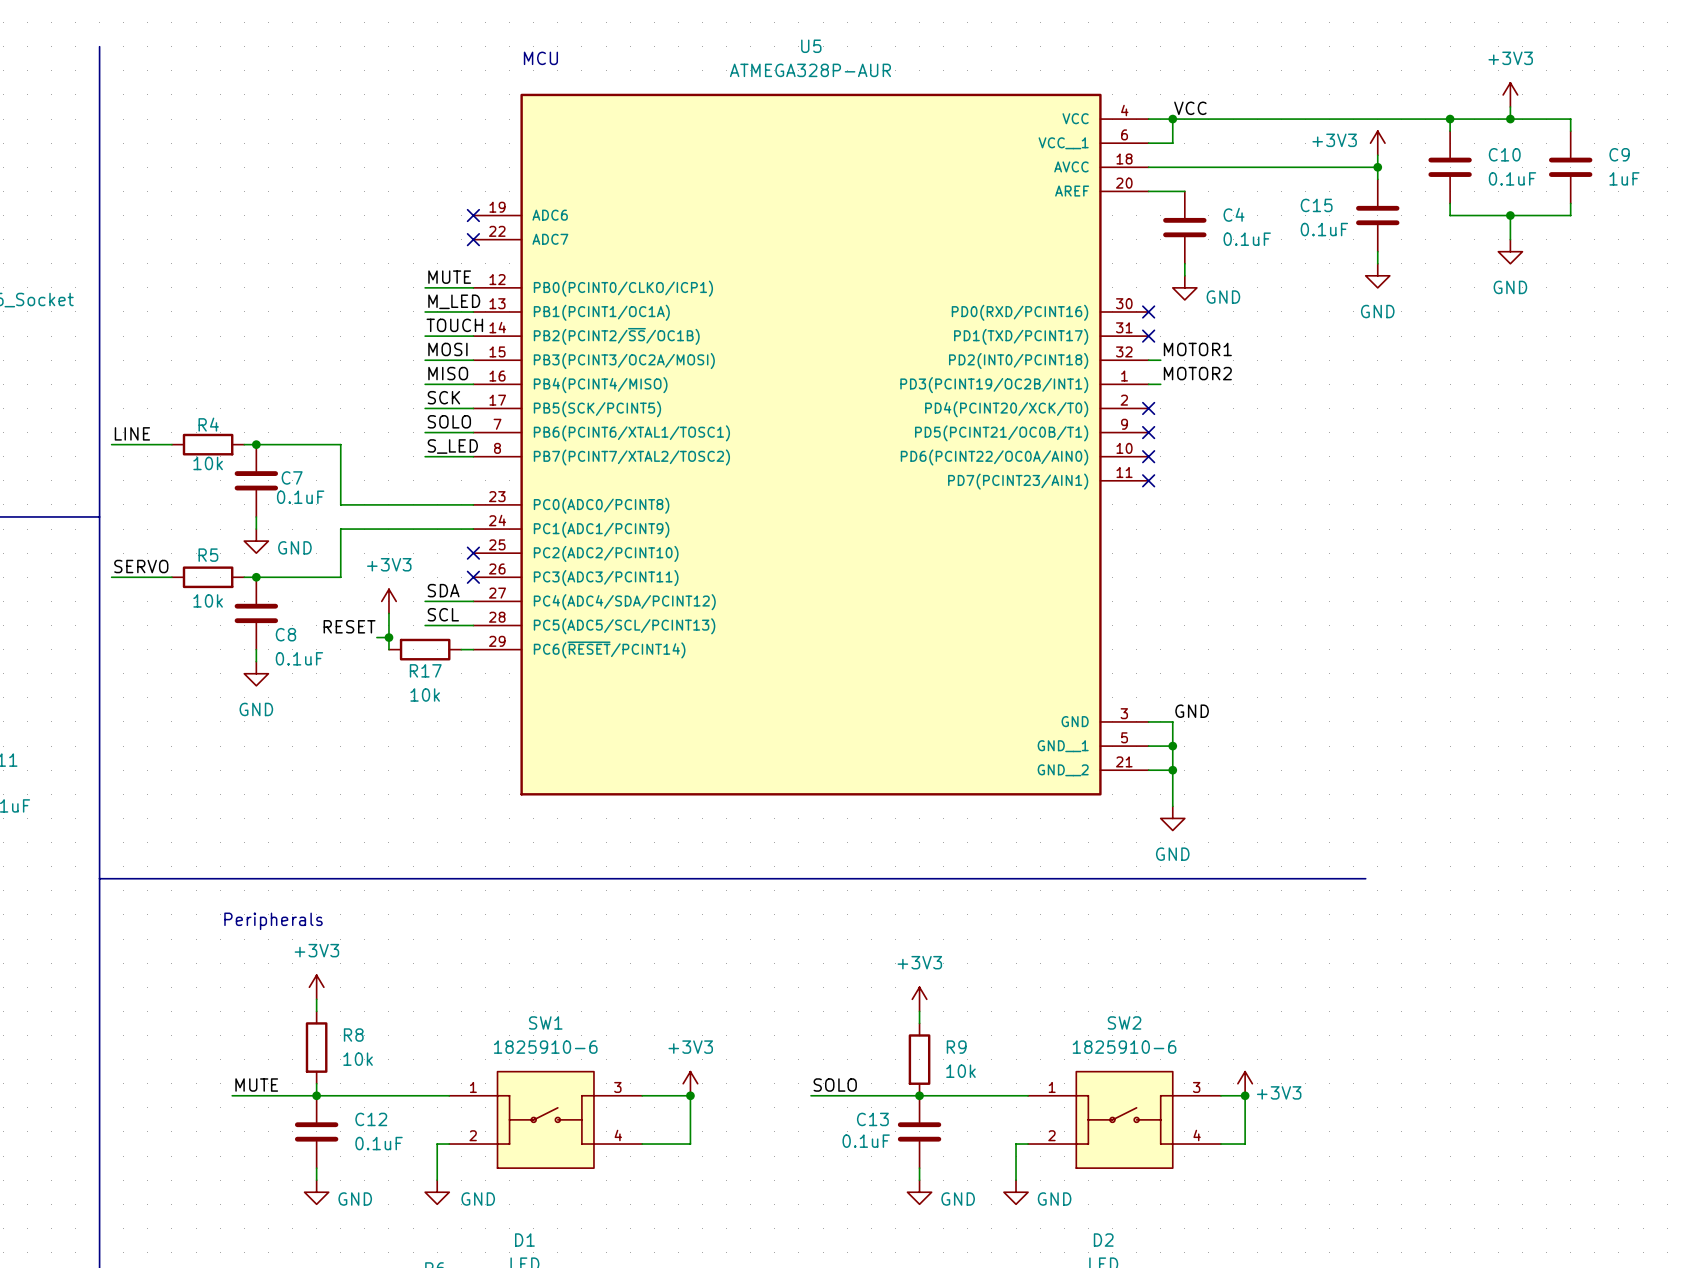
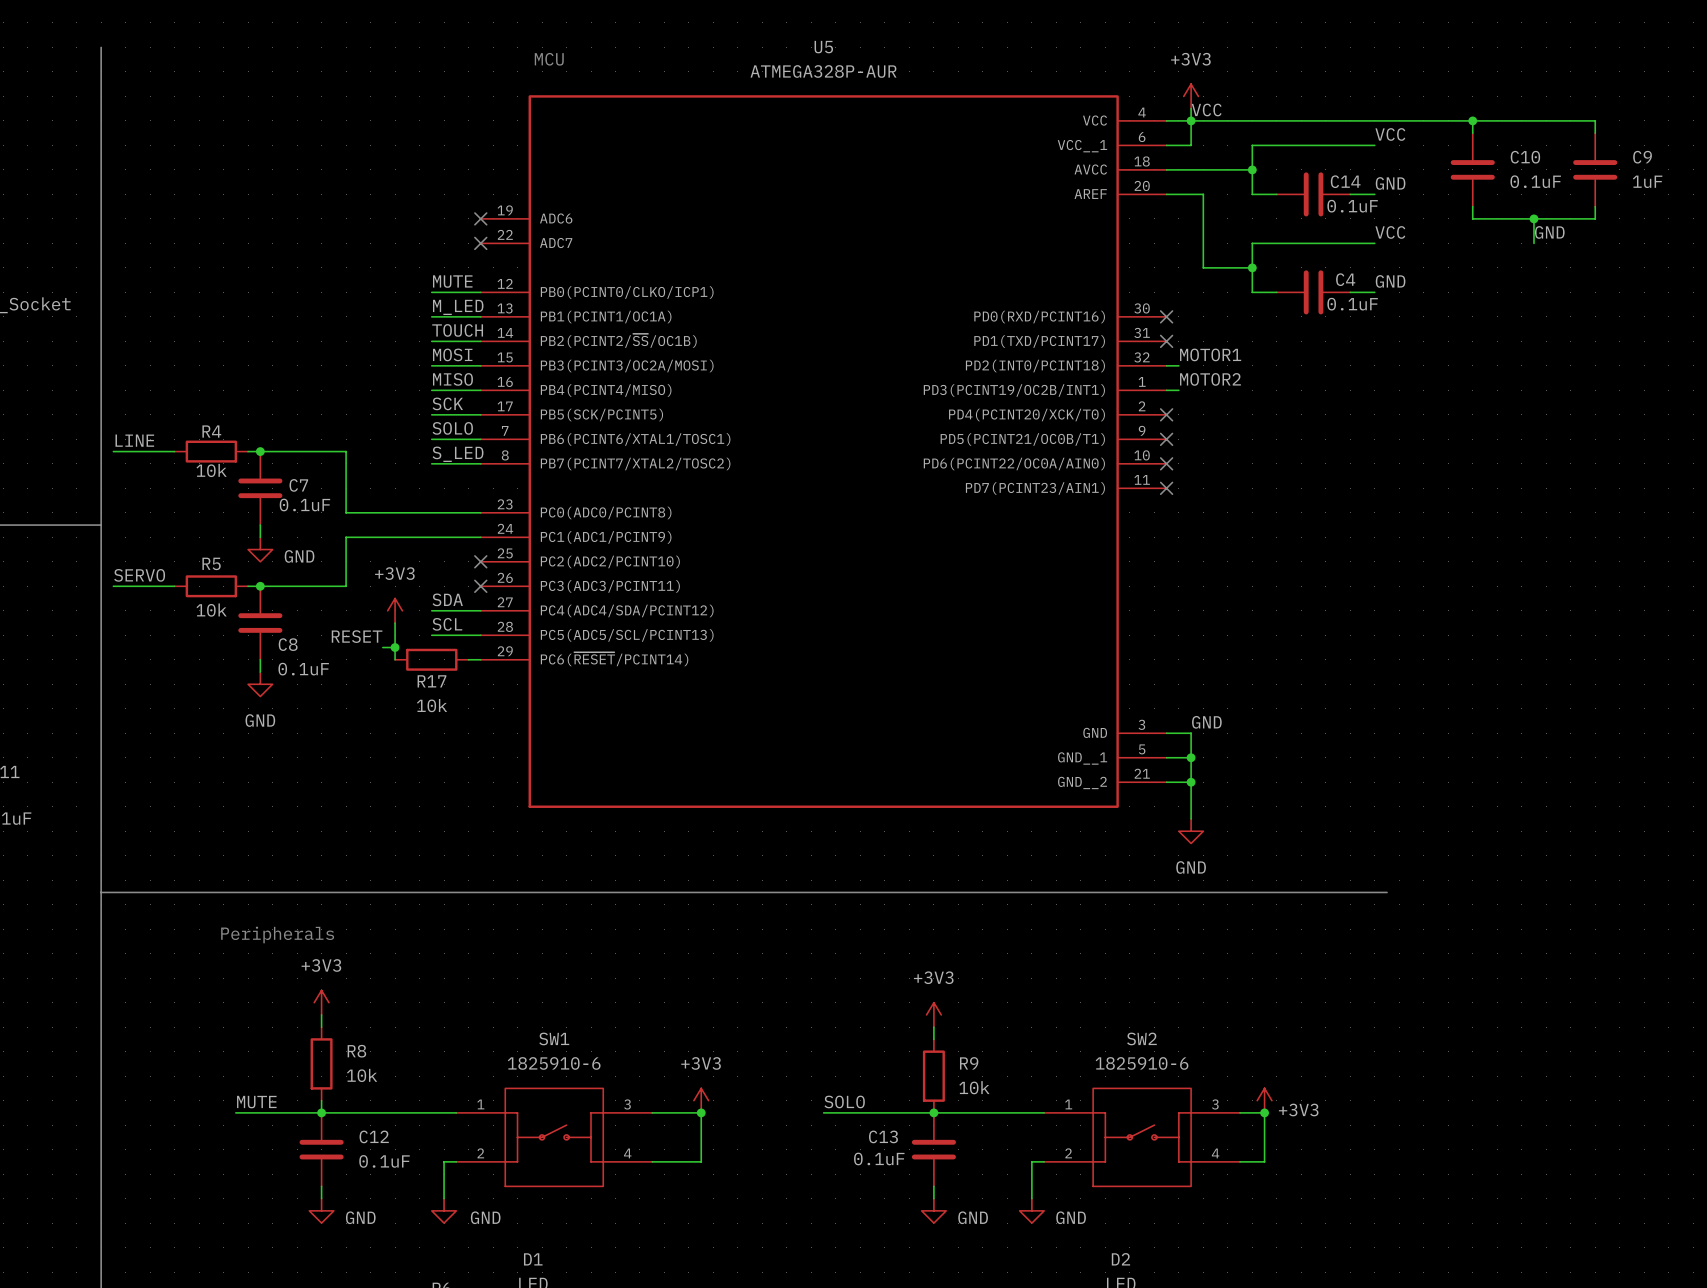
power symbol: none -> +3V3 (1191, 96)
power symbol: +3V3 (1510, 94) -> none
wire: (1510, 107) (1510, 119) -> none
junction: (1510, 119) -> none
label: none -> VCC (1390, 134)
wire: none -> (1374, 145) (1252, 145) (1252, 194) (1276, 194)
power symbol: +3V3 (1377, 143) -> none
wire: (1377, 155) (1377, 179) -> none
wire: (1233, 167) (1377, 167) -> none
junction: none -> (1252, 169)
junction: (1377, 167) -> none
label: none -> GND (1390, 183)
wire: none -> (1203, 194) (1203, 267) (1252, 267)
C14: none -> 0.1uF (1313, 194)
wire: none -> (1350, 194) (1374, 194)
C4 name position: C4 (1234, 214) -> C4 (1345, 279)
C15: 0.1uF (1377, 215) -> none
C4 rotation: 0° (1184, 227) -> 90° clockwise (1313, 292)
C4 position: (1184, 227) -> (1313, 292)
label: none -> VCC (1390, 232)
label: none -> GND (1549, 232)
C4 value position: 0.1uF (1247, 239) -> 0.1uF (1352, 304)
wire: none -> (1374, 243) (1252, 243) (1252, 292) (1276, 292)
wire: (1377, 251) (1377, 263) -> none
power symbol: GND (1510, 251) -> none
wire: (1184, 263) (1184, 275) -> (1191, 108) (1191, 120)
junction: none -> (1252, 267)
power symbol: GND (1377, 275) -> none
label: none -> GND (1390, 281)
power symbol: GND (1184, 287) -> none
wire: none -> (1350, 292) (1374, 292)

